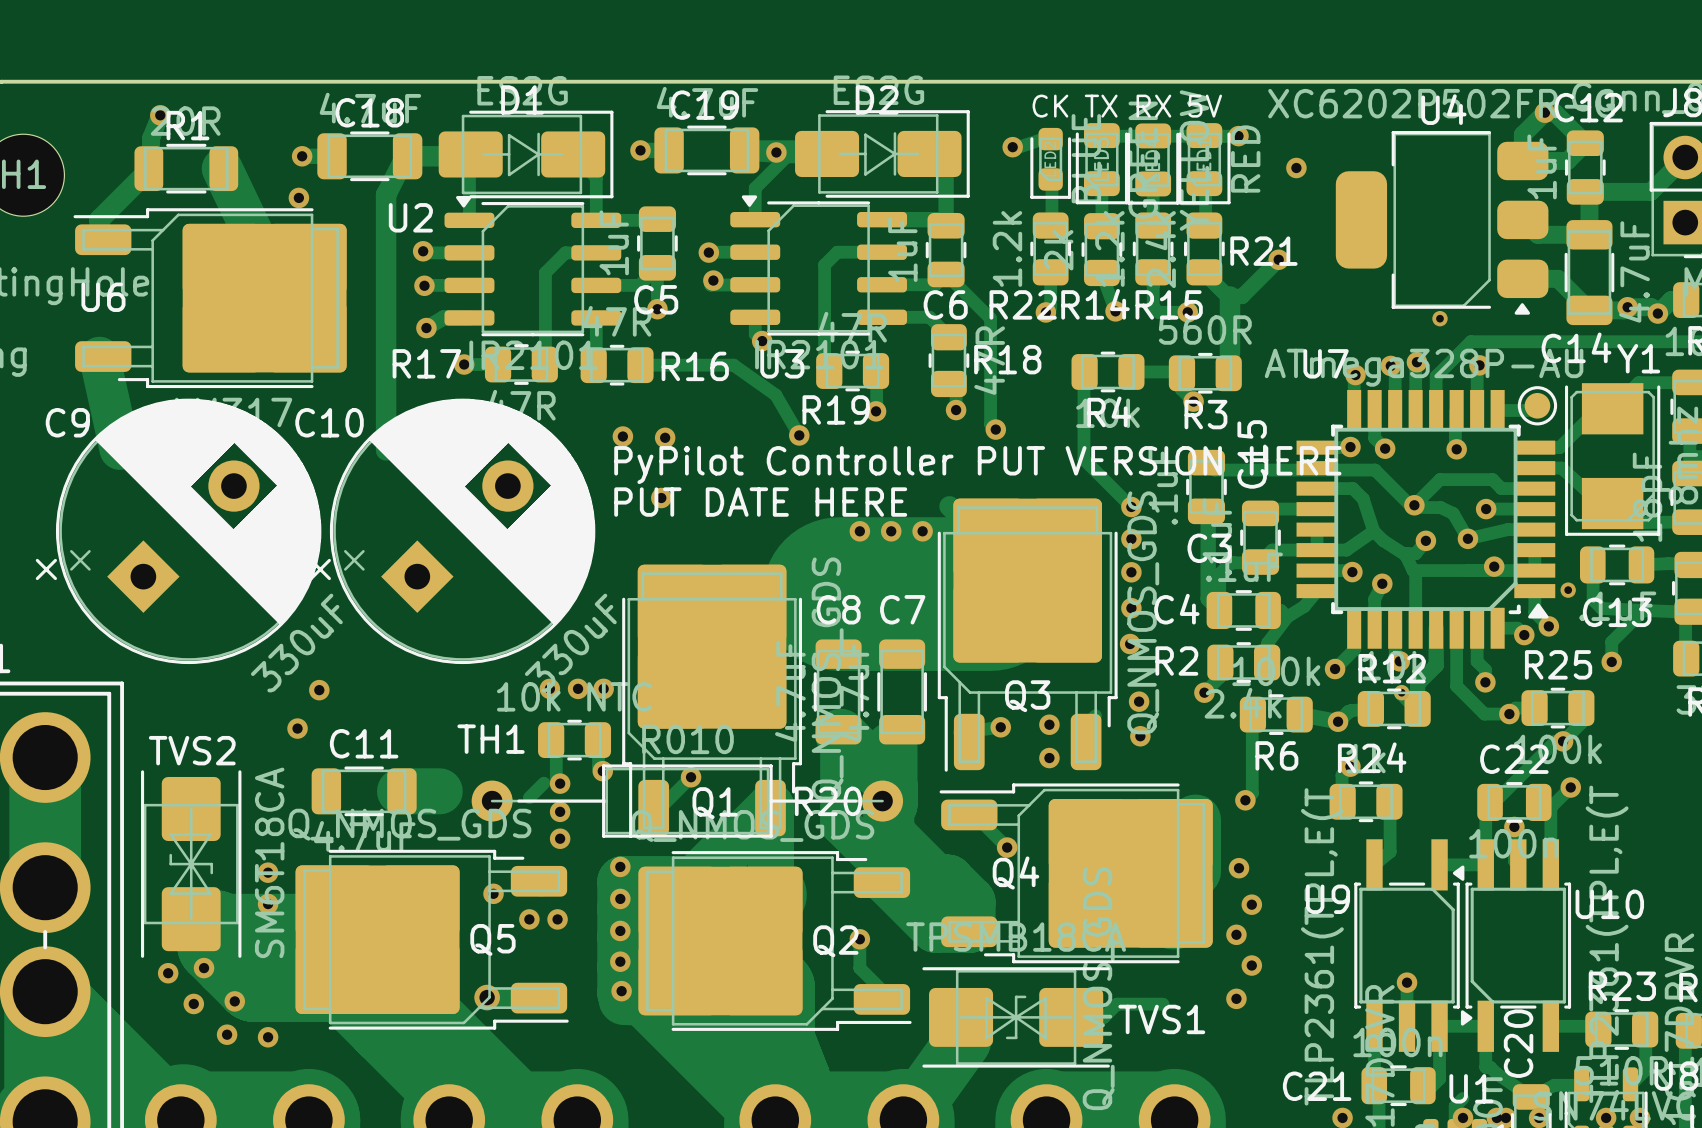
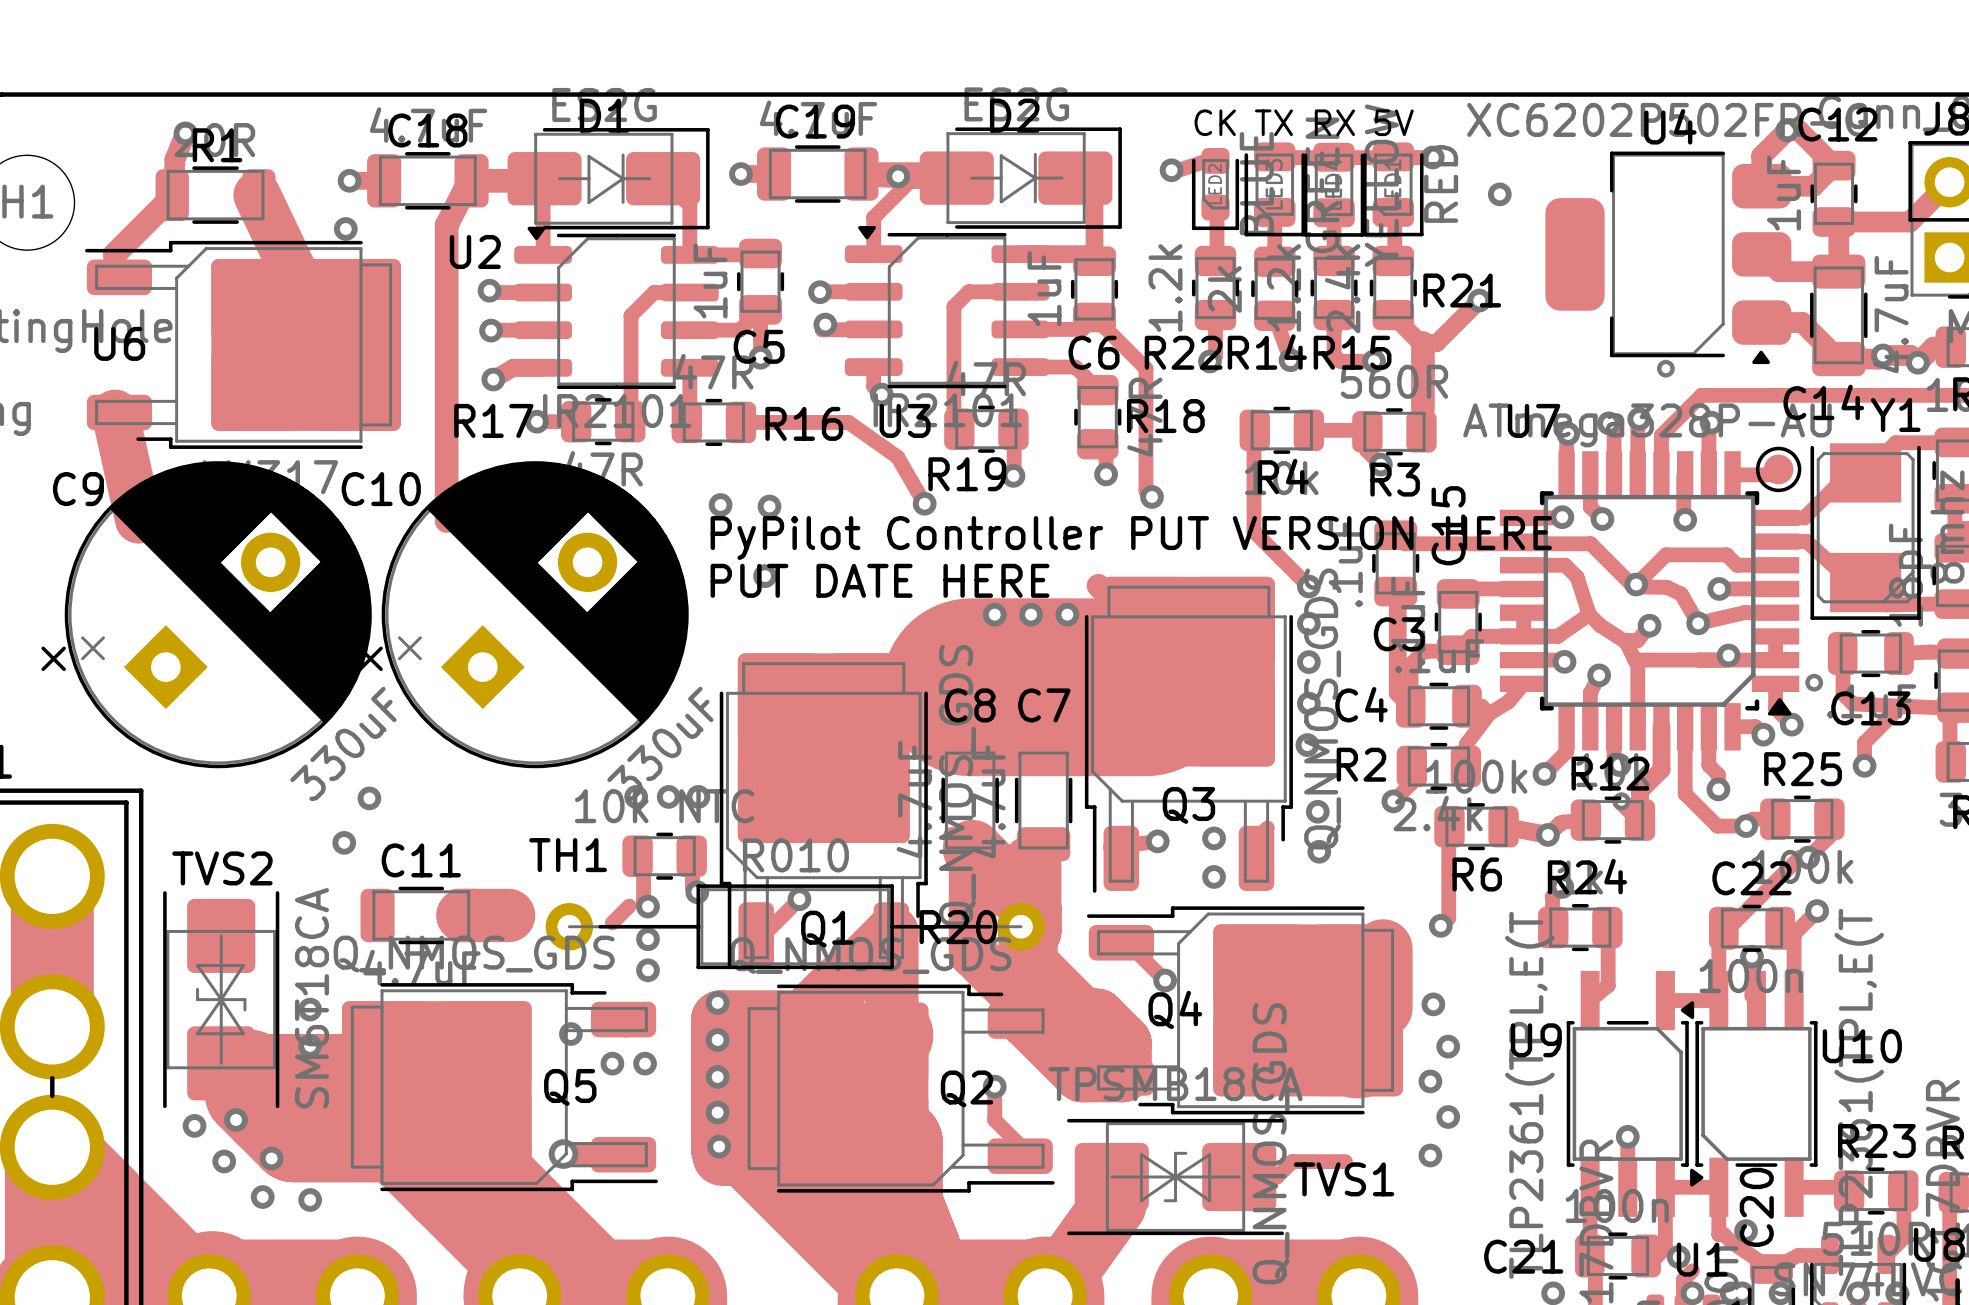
via: none -> (1746, 1231)
via: none -> (1678, 1256)

